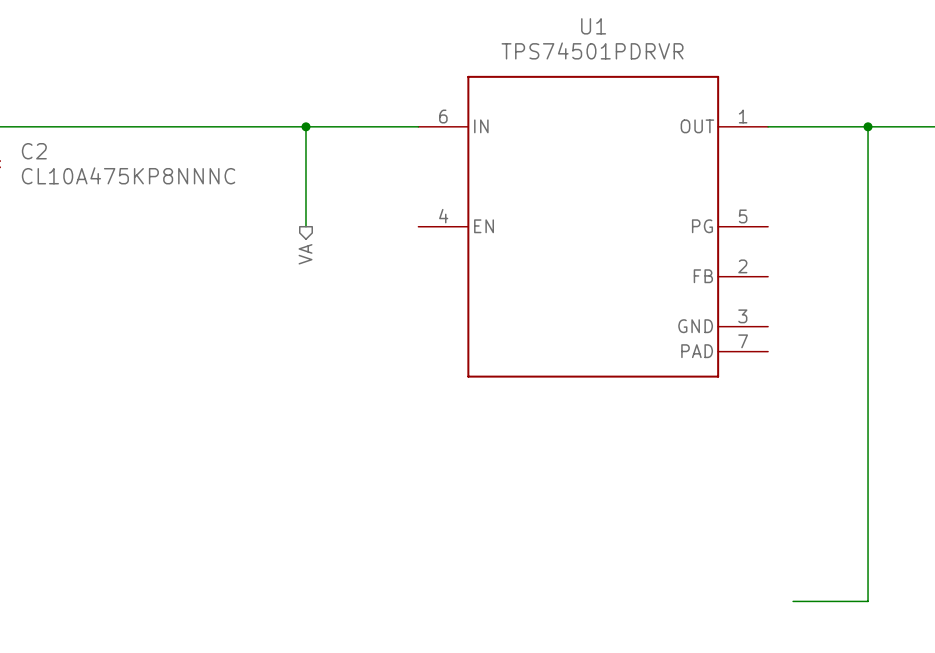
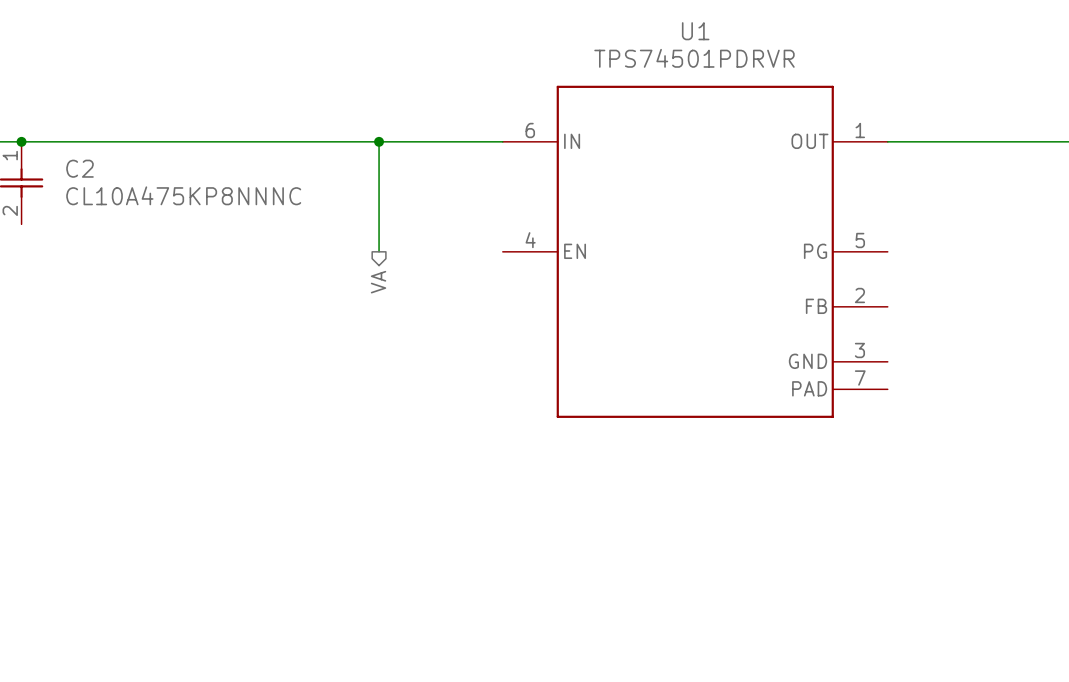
wire: (868, 126) (868, 601) (793, 601) -> none
junction: (868, 126) -> none

